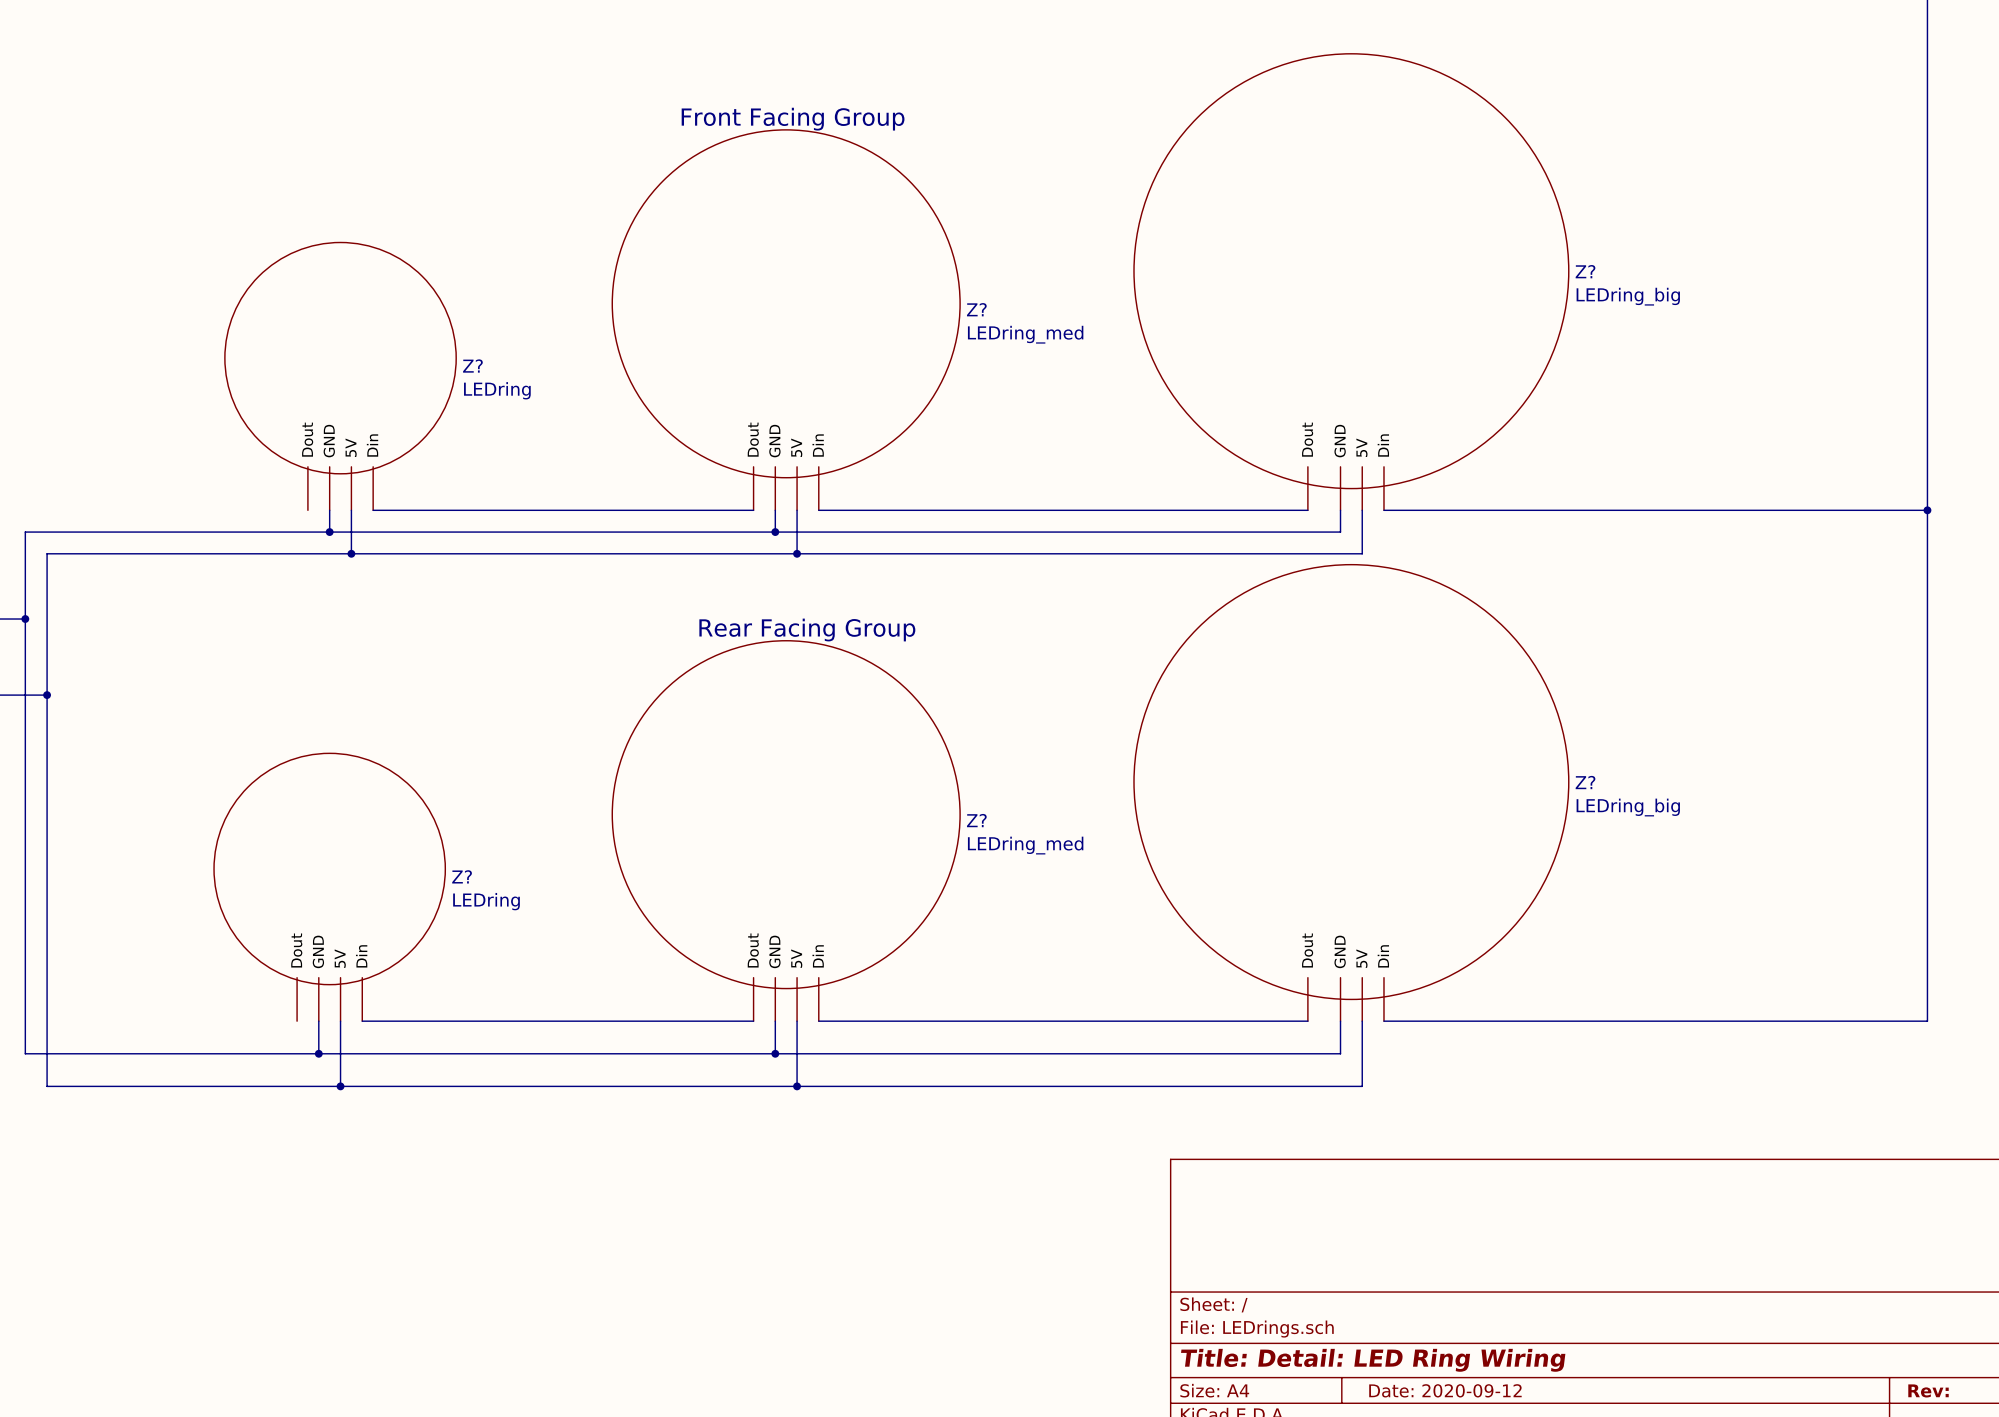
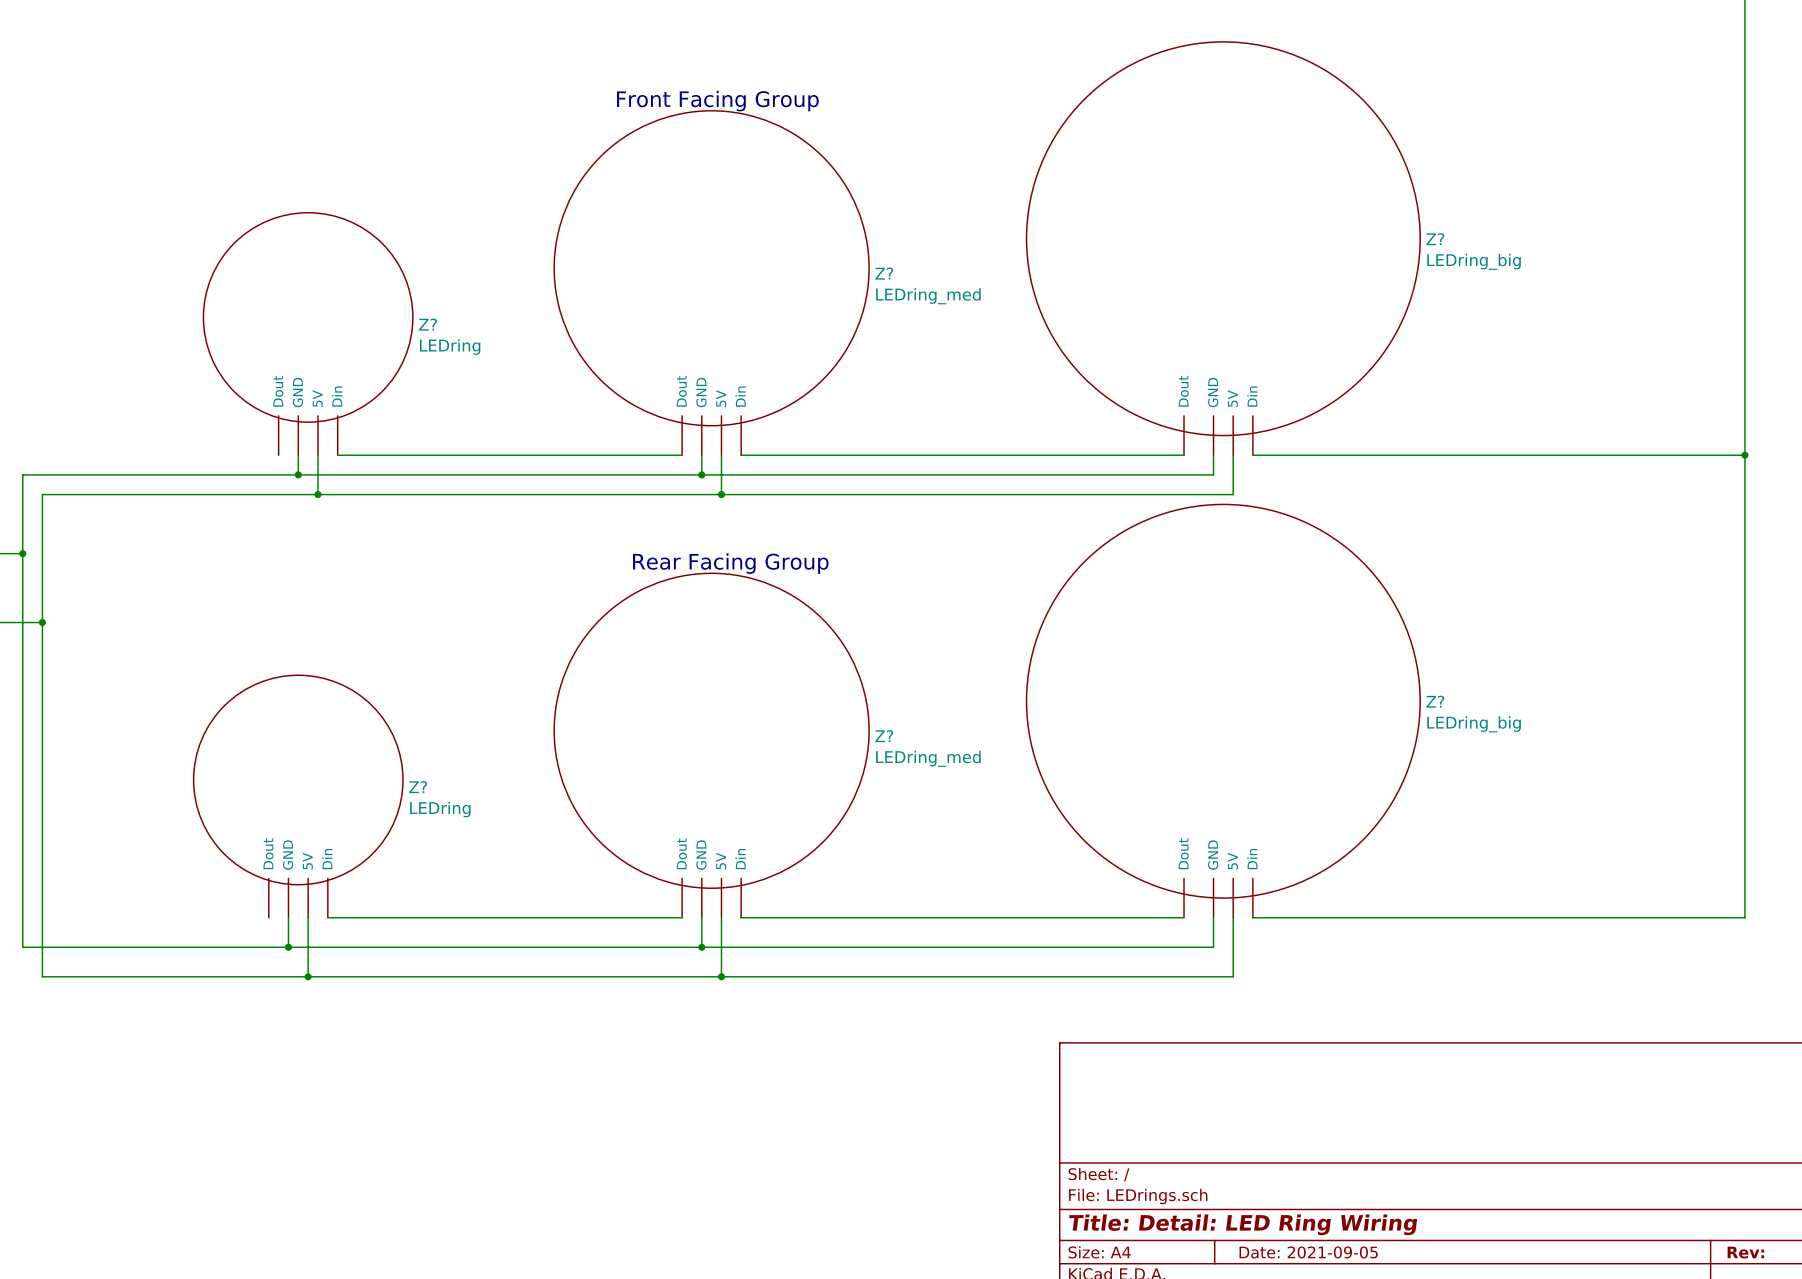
title block: Date: 2020-09-12 (1445, 1390) -> Date: 2021-09-05 (1308, 1252)

